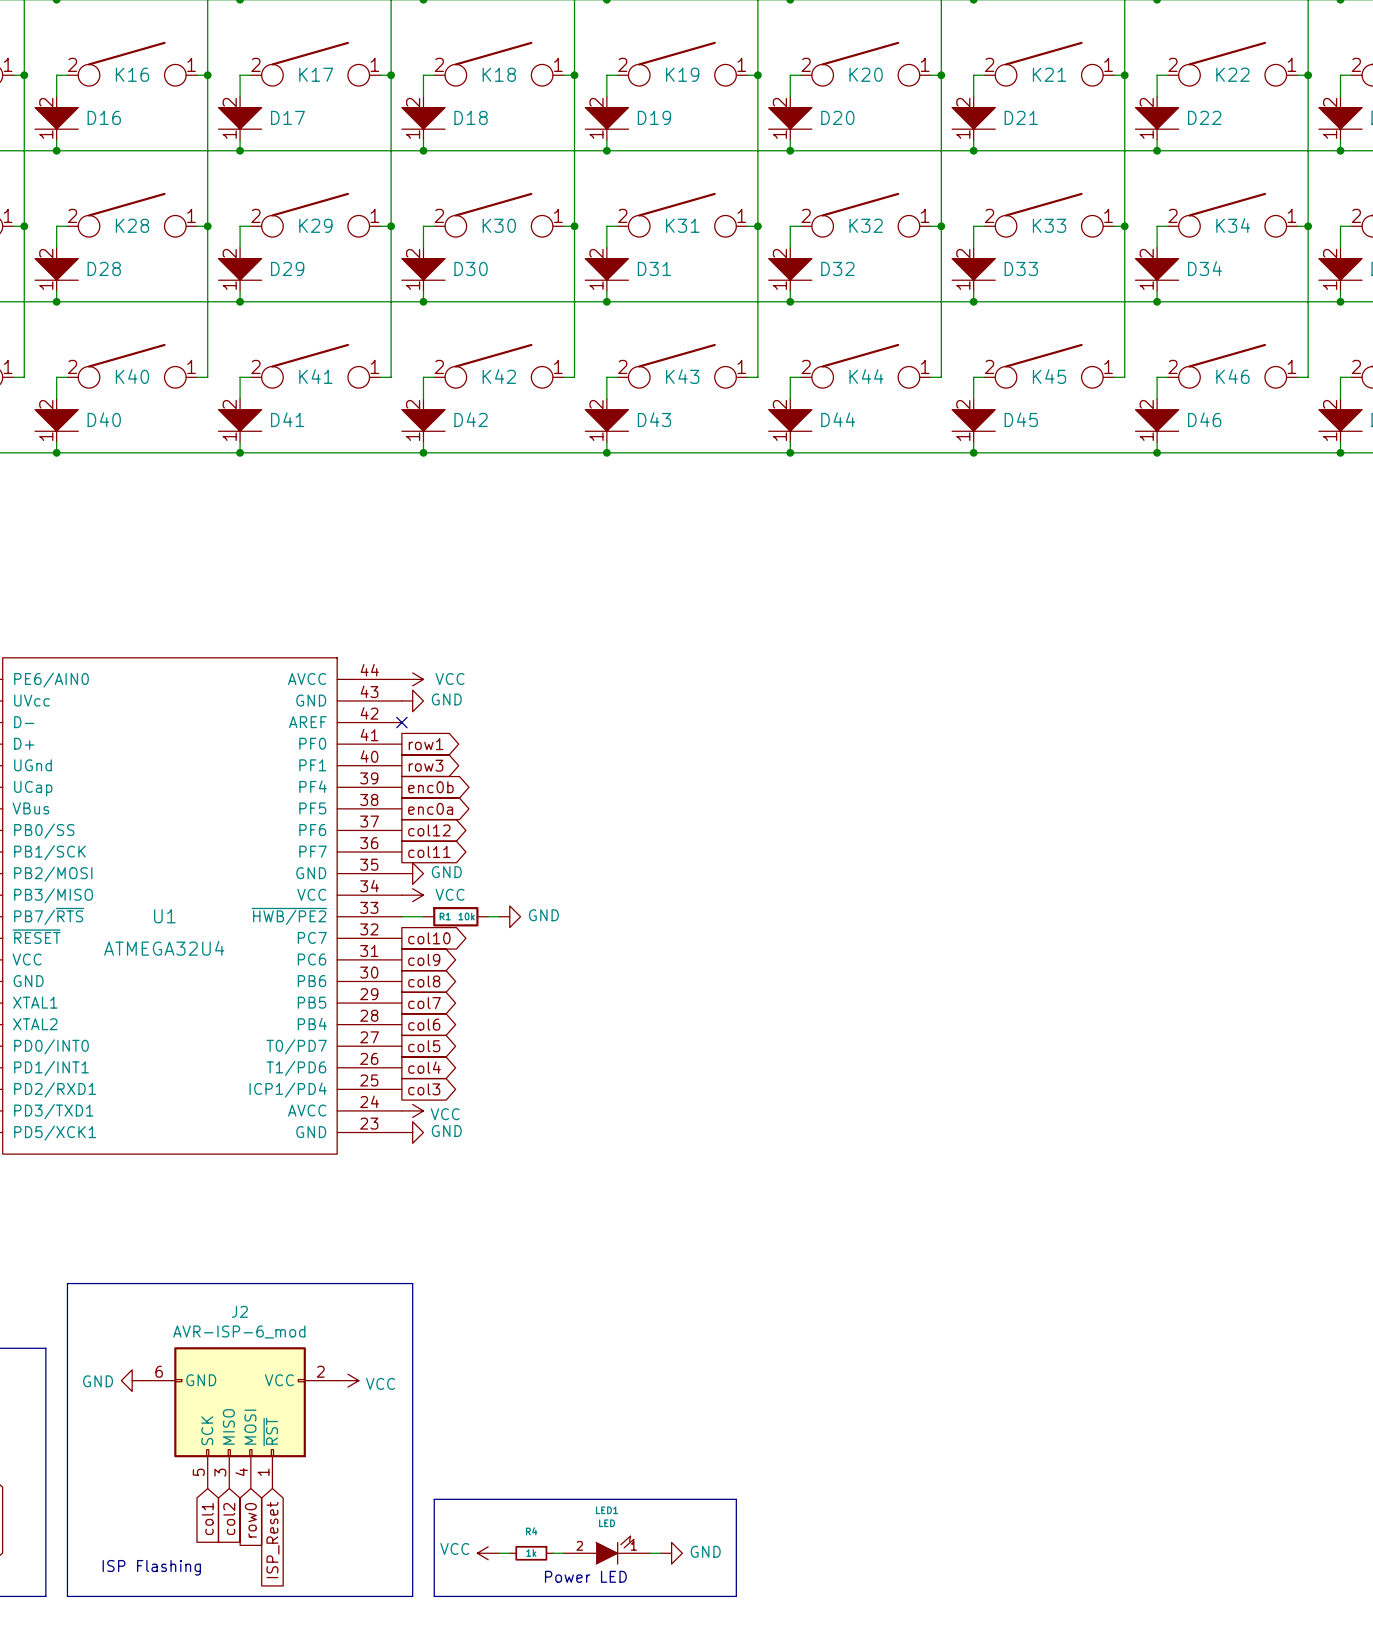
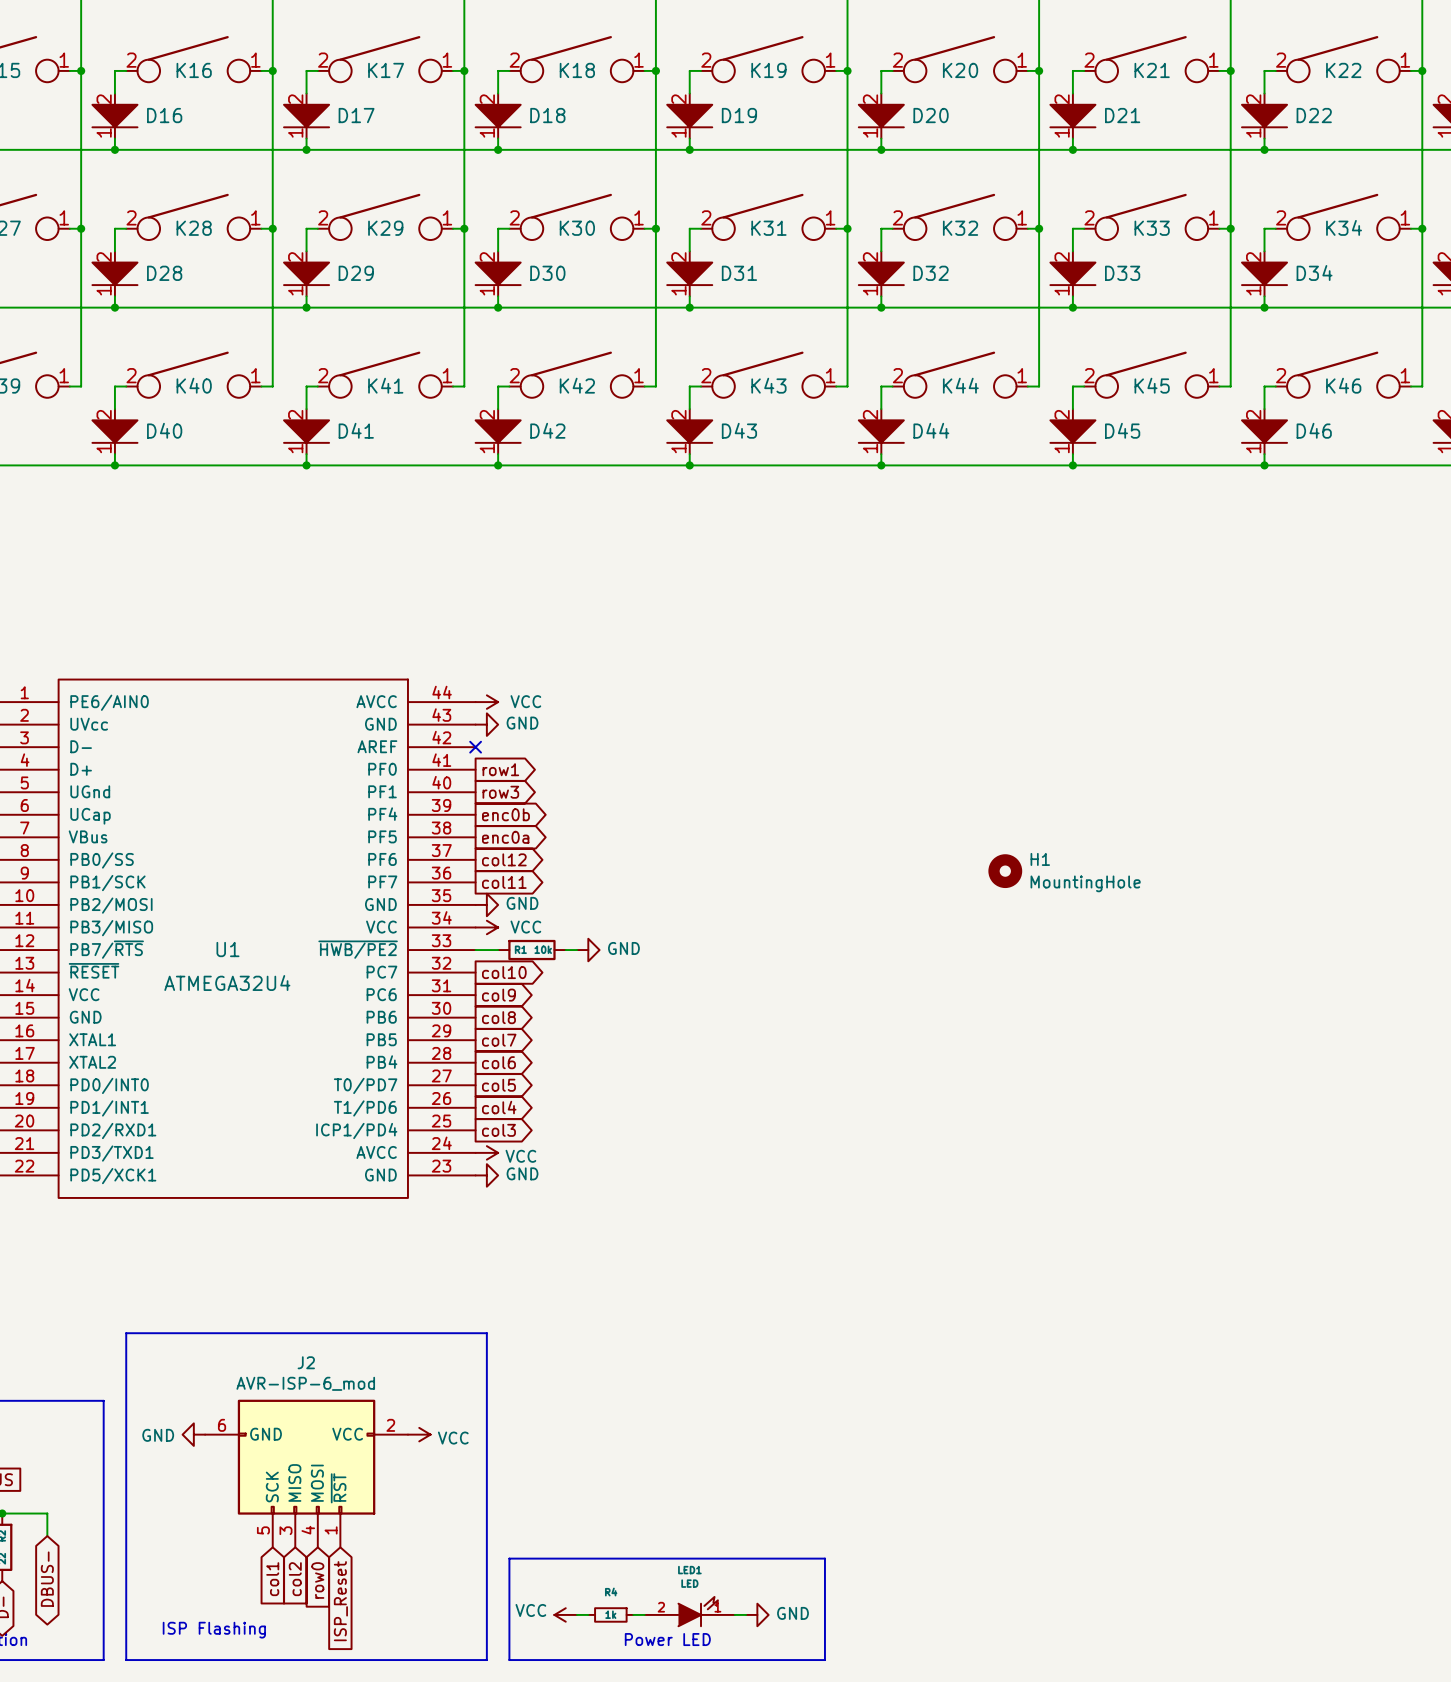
H1: none -> MountingHole (1005, 871)

